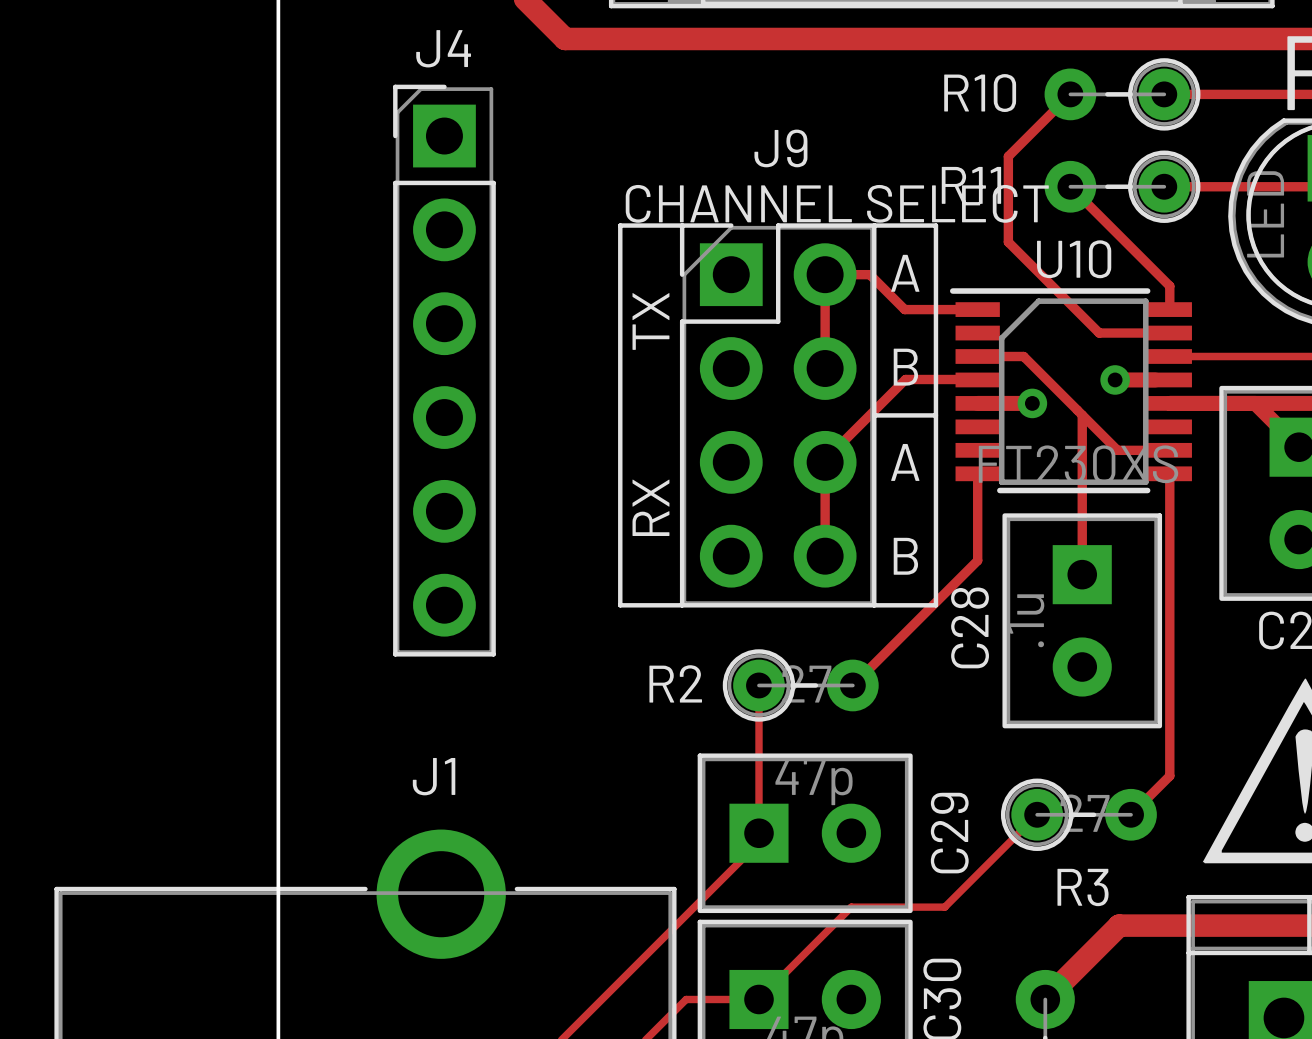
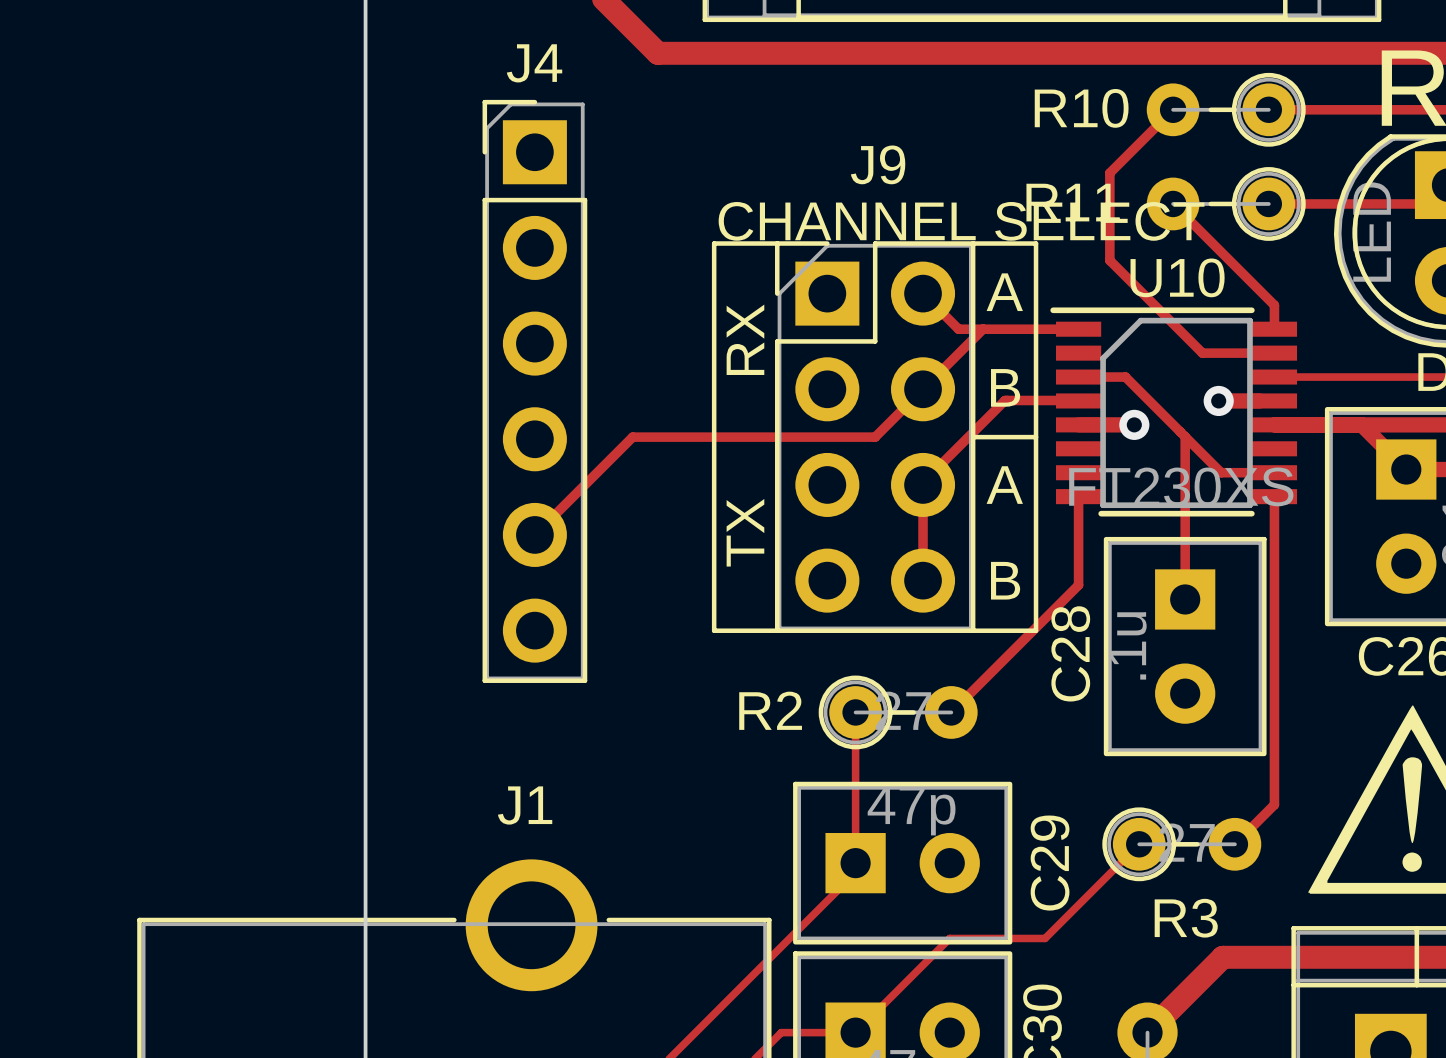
track: none -> (983, 329) (875, 437) (632, 437) (534, 534)
track: (904, 309) (869, 274) (825, 274) (825, 368) -> (1004, 329) (958, 329) (923, 293)
text: TX (650, 321) -> RX (745, 339)
text: RX (650, 507) -> TX (745, 532)

